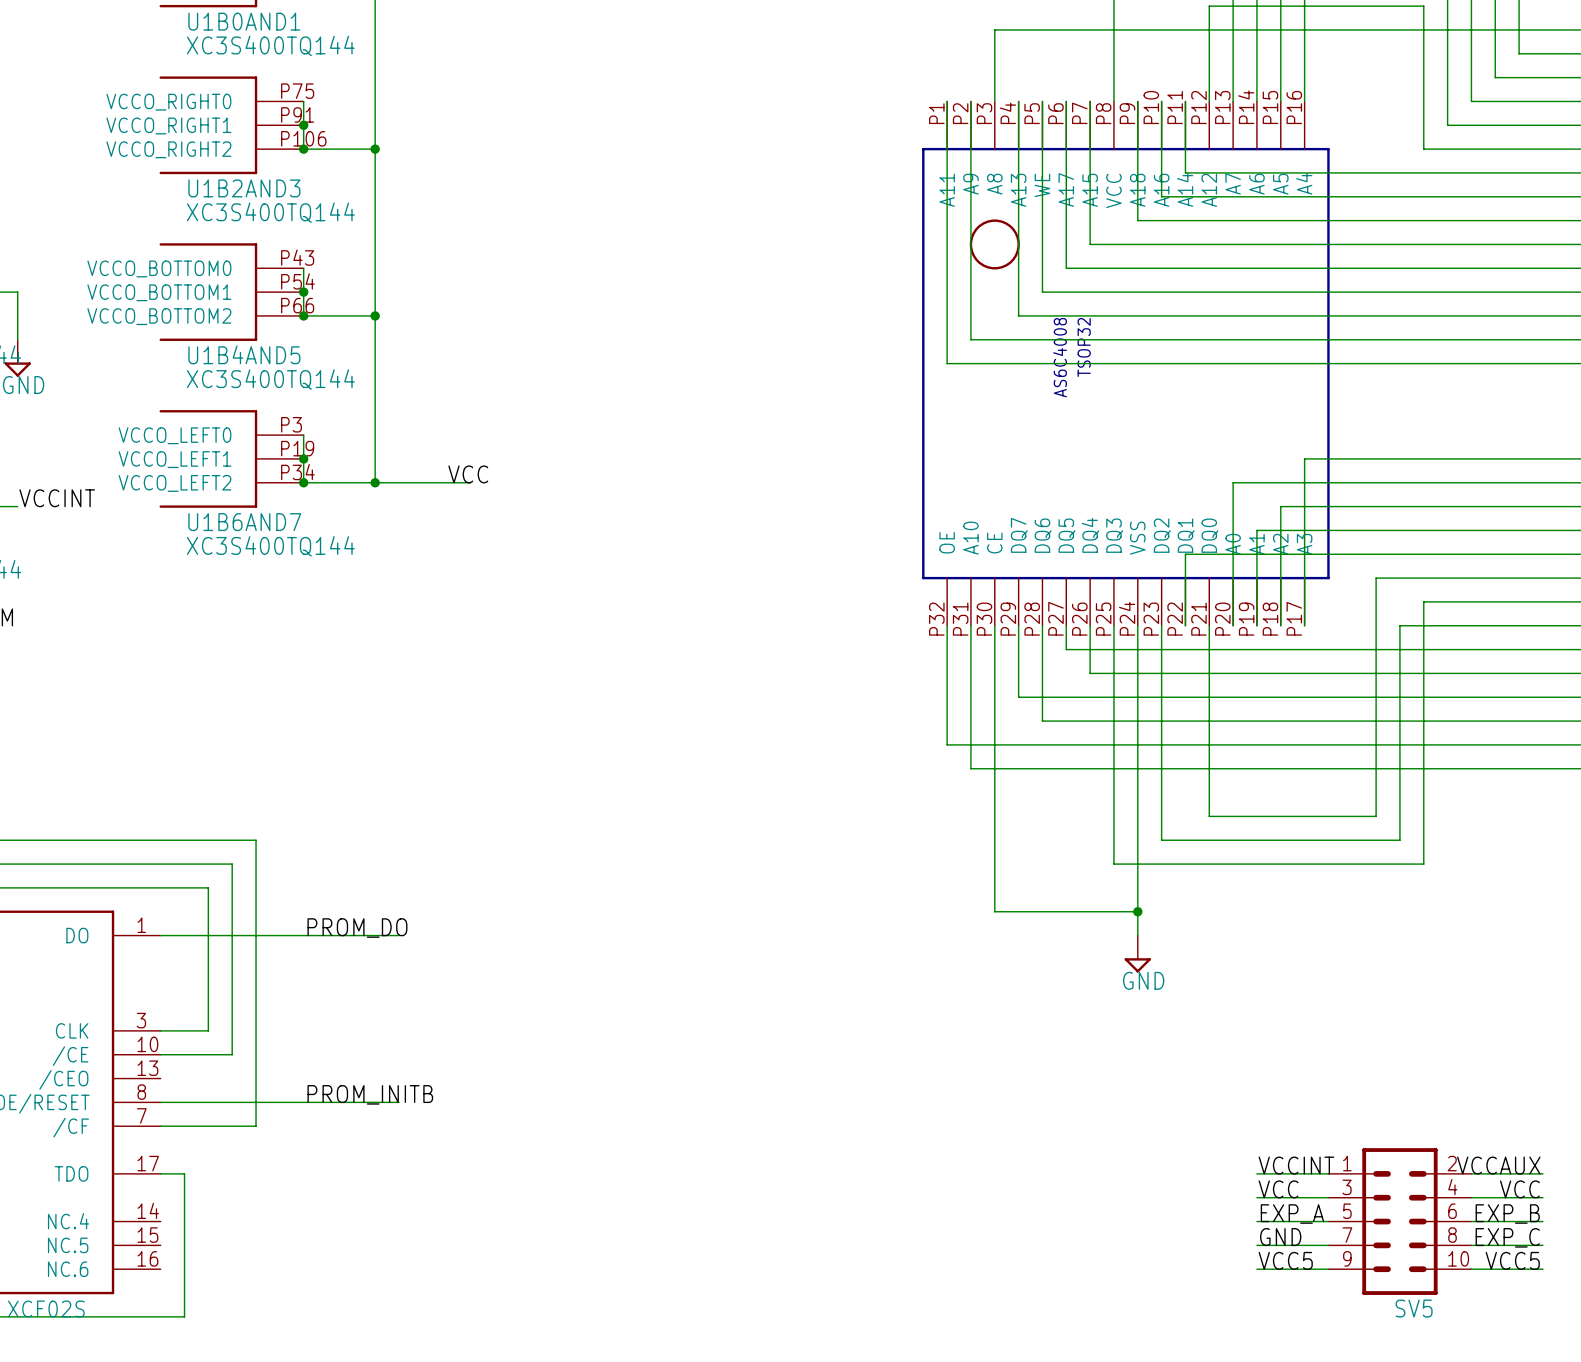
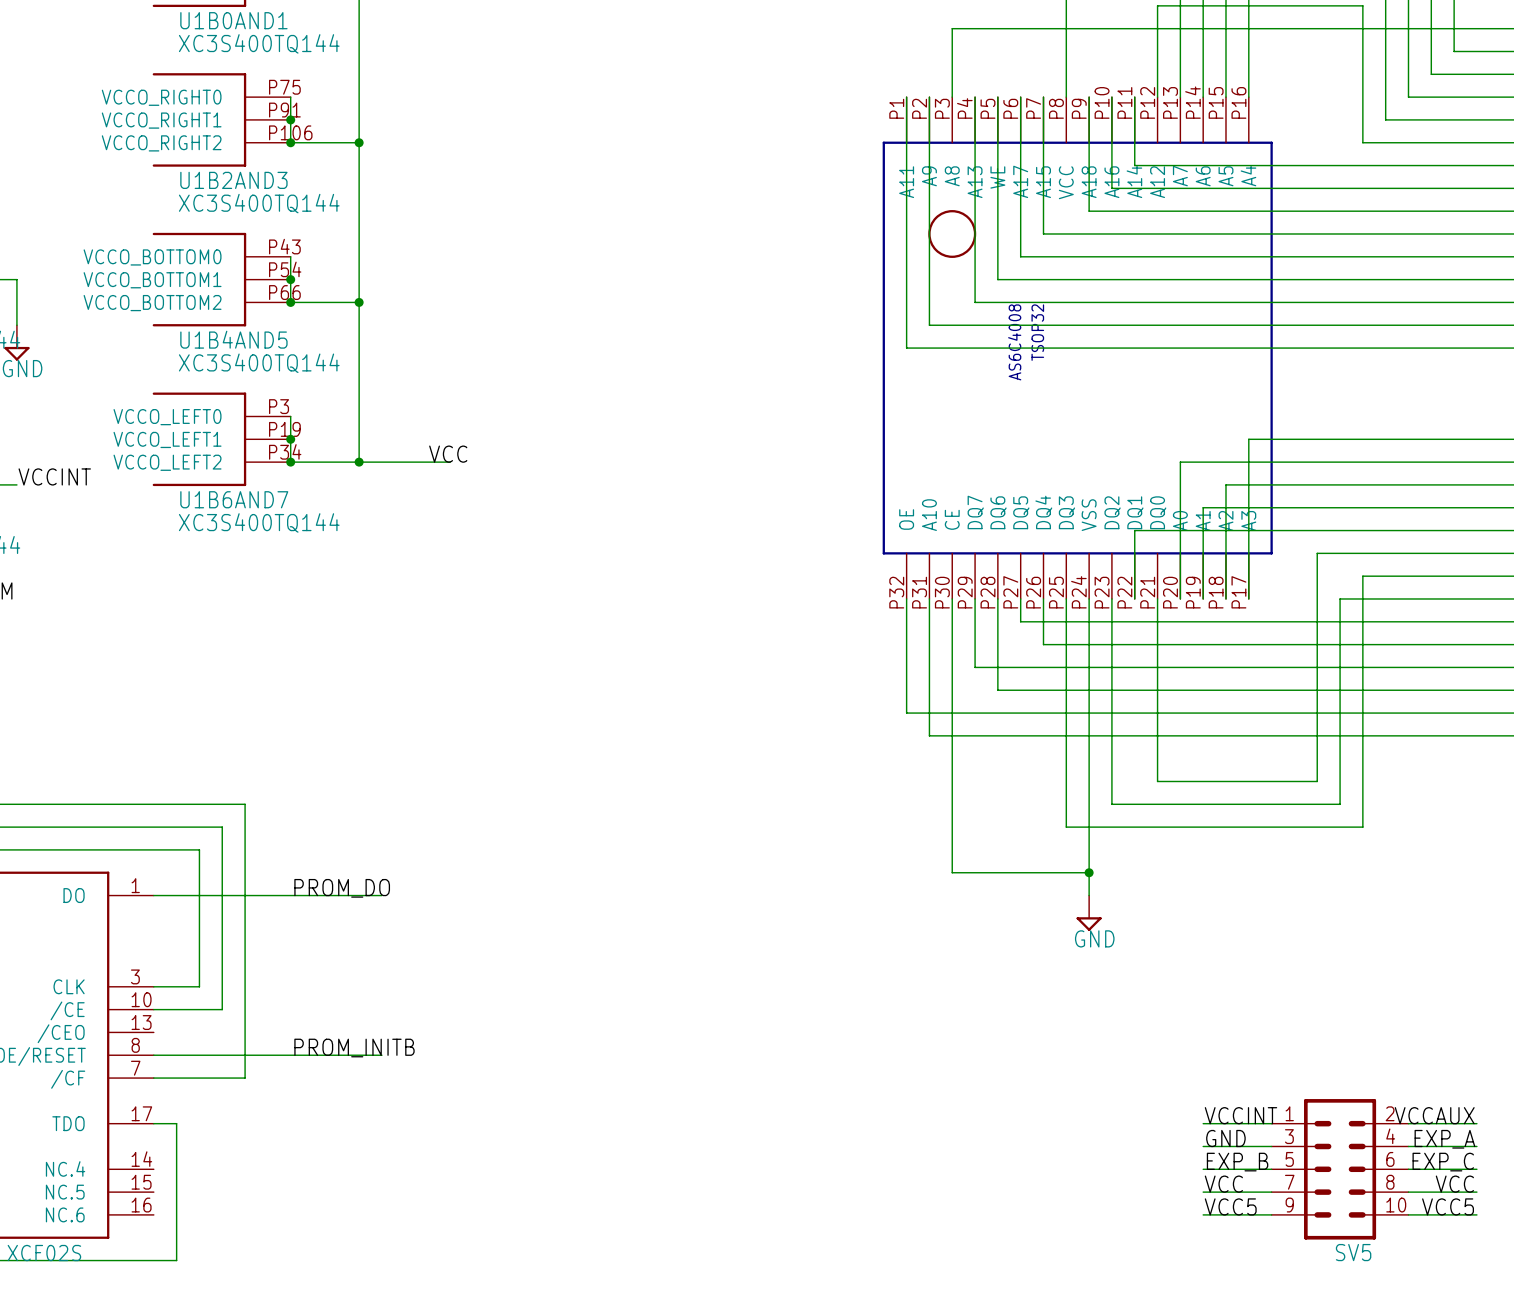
label: VCC (1278, 1189) -> GND (1225, 1138)
label: VCC (1519, 1189) -> EXP_A (1444, 1139)
label: EXP_A (1292, 1214) -> EXP_B (1237, 1162)
label: EXP_B (1507, 1214) -> EXP_C (1443, 1162)
label: GND (1280, 1237) -> VCC (1223, 1184)
label: EXP_C (1507, 1237) -> VCC (1454, 1184)

